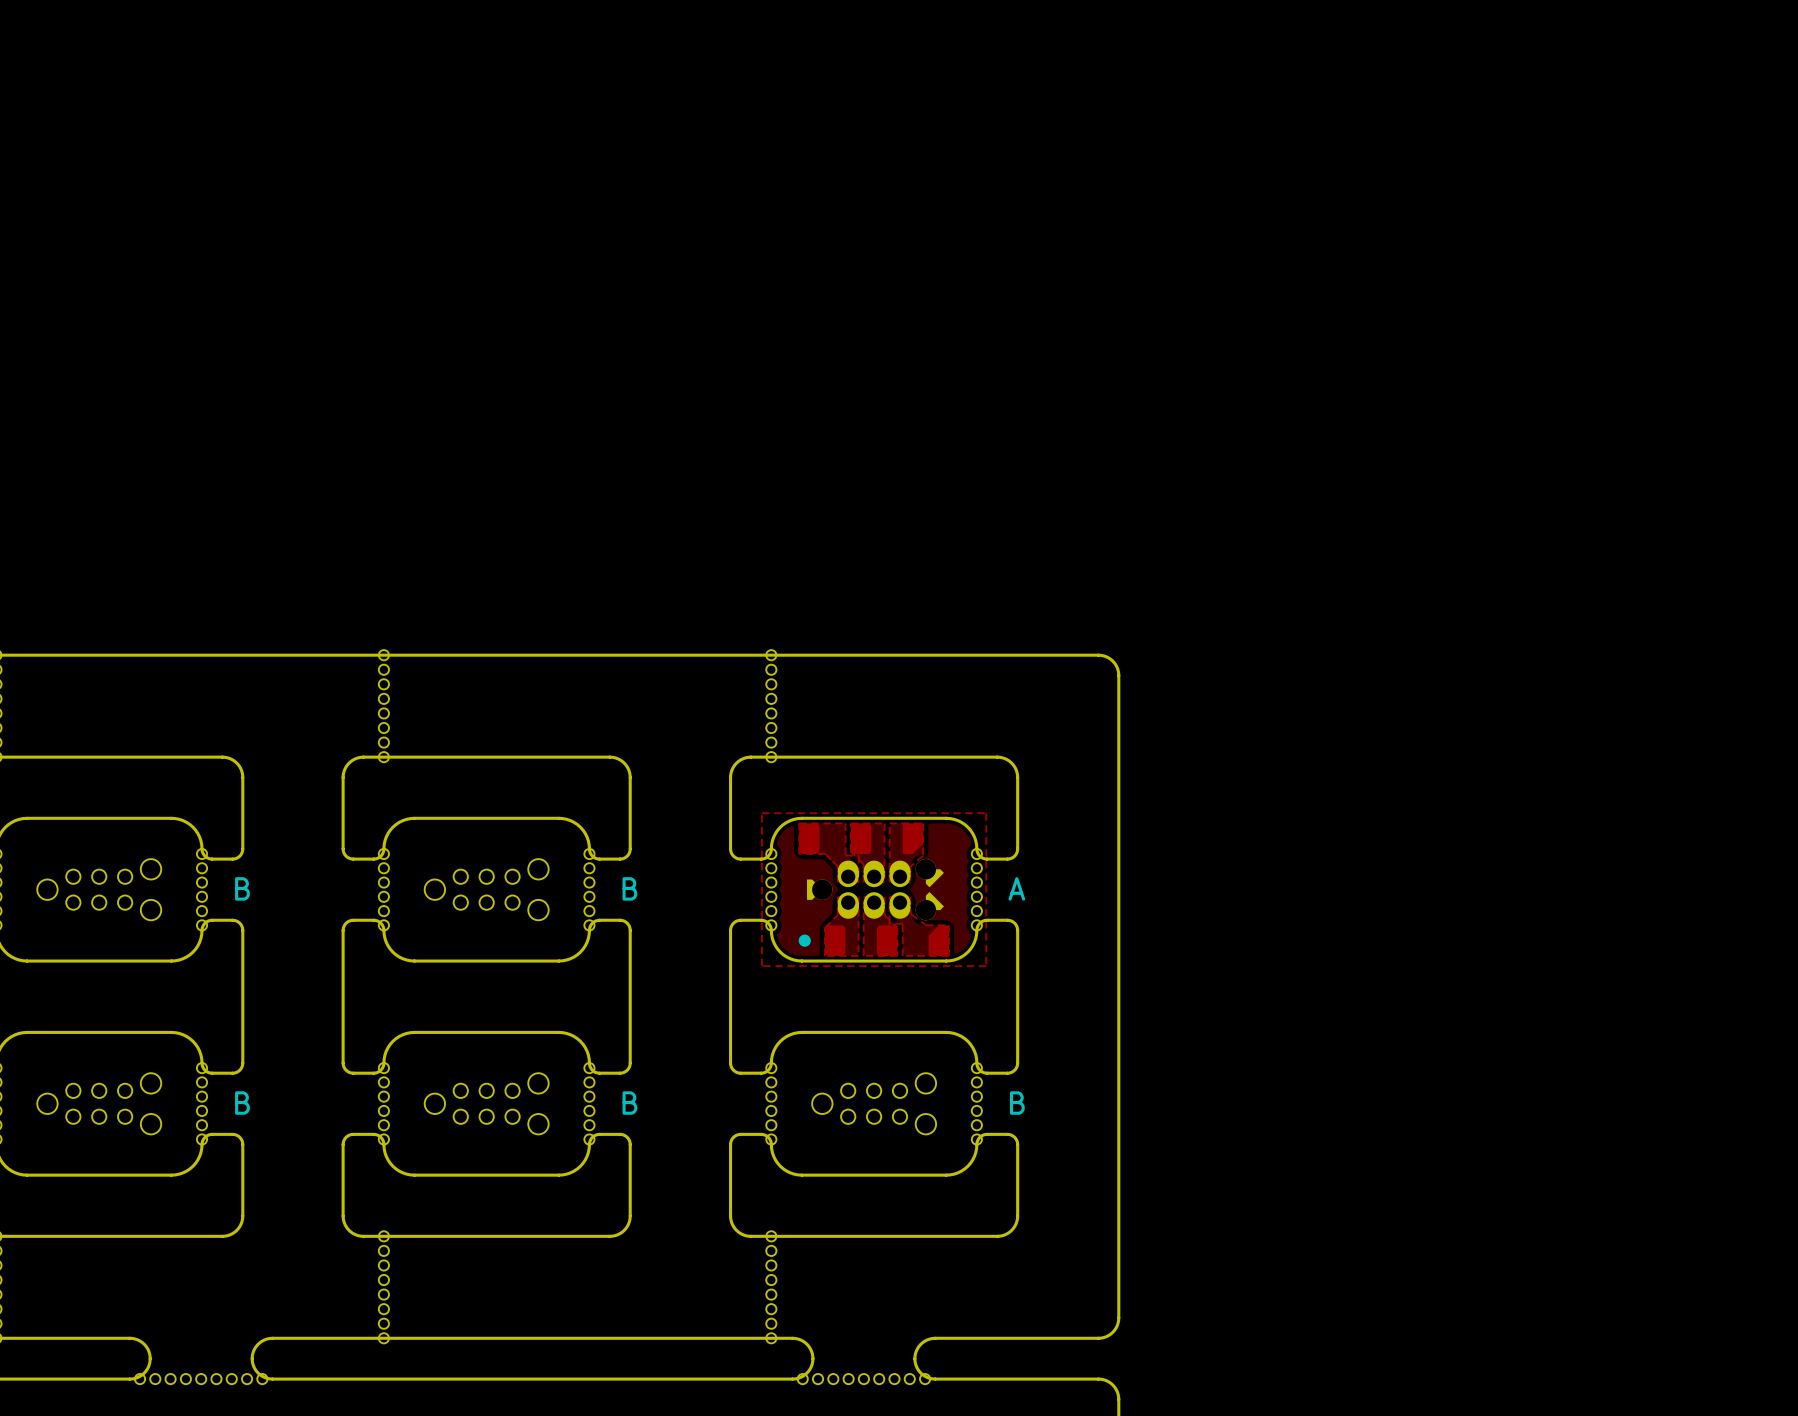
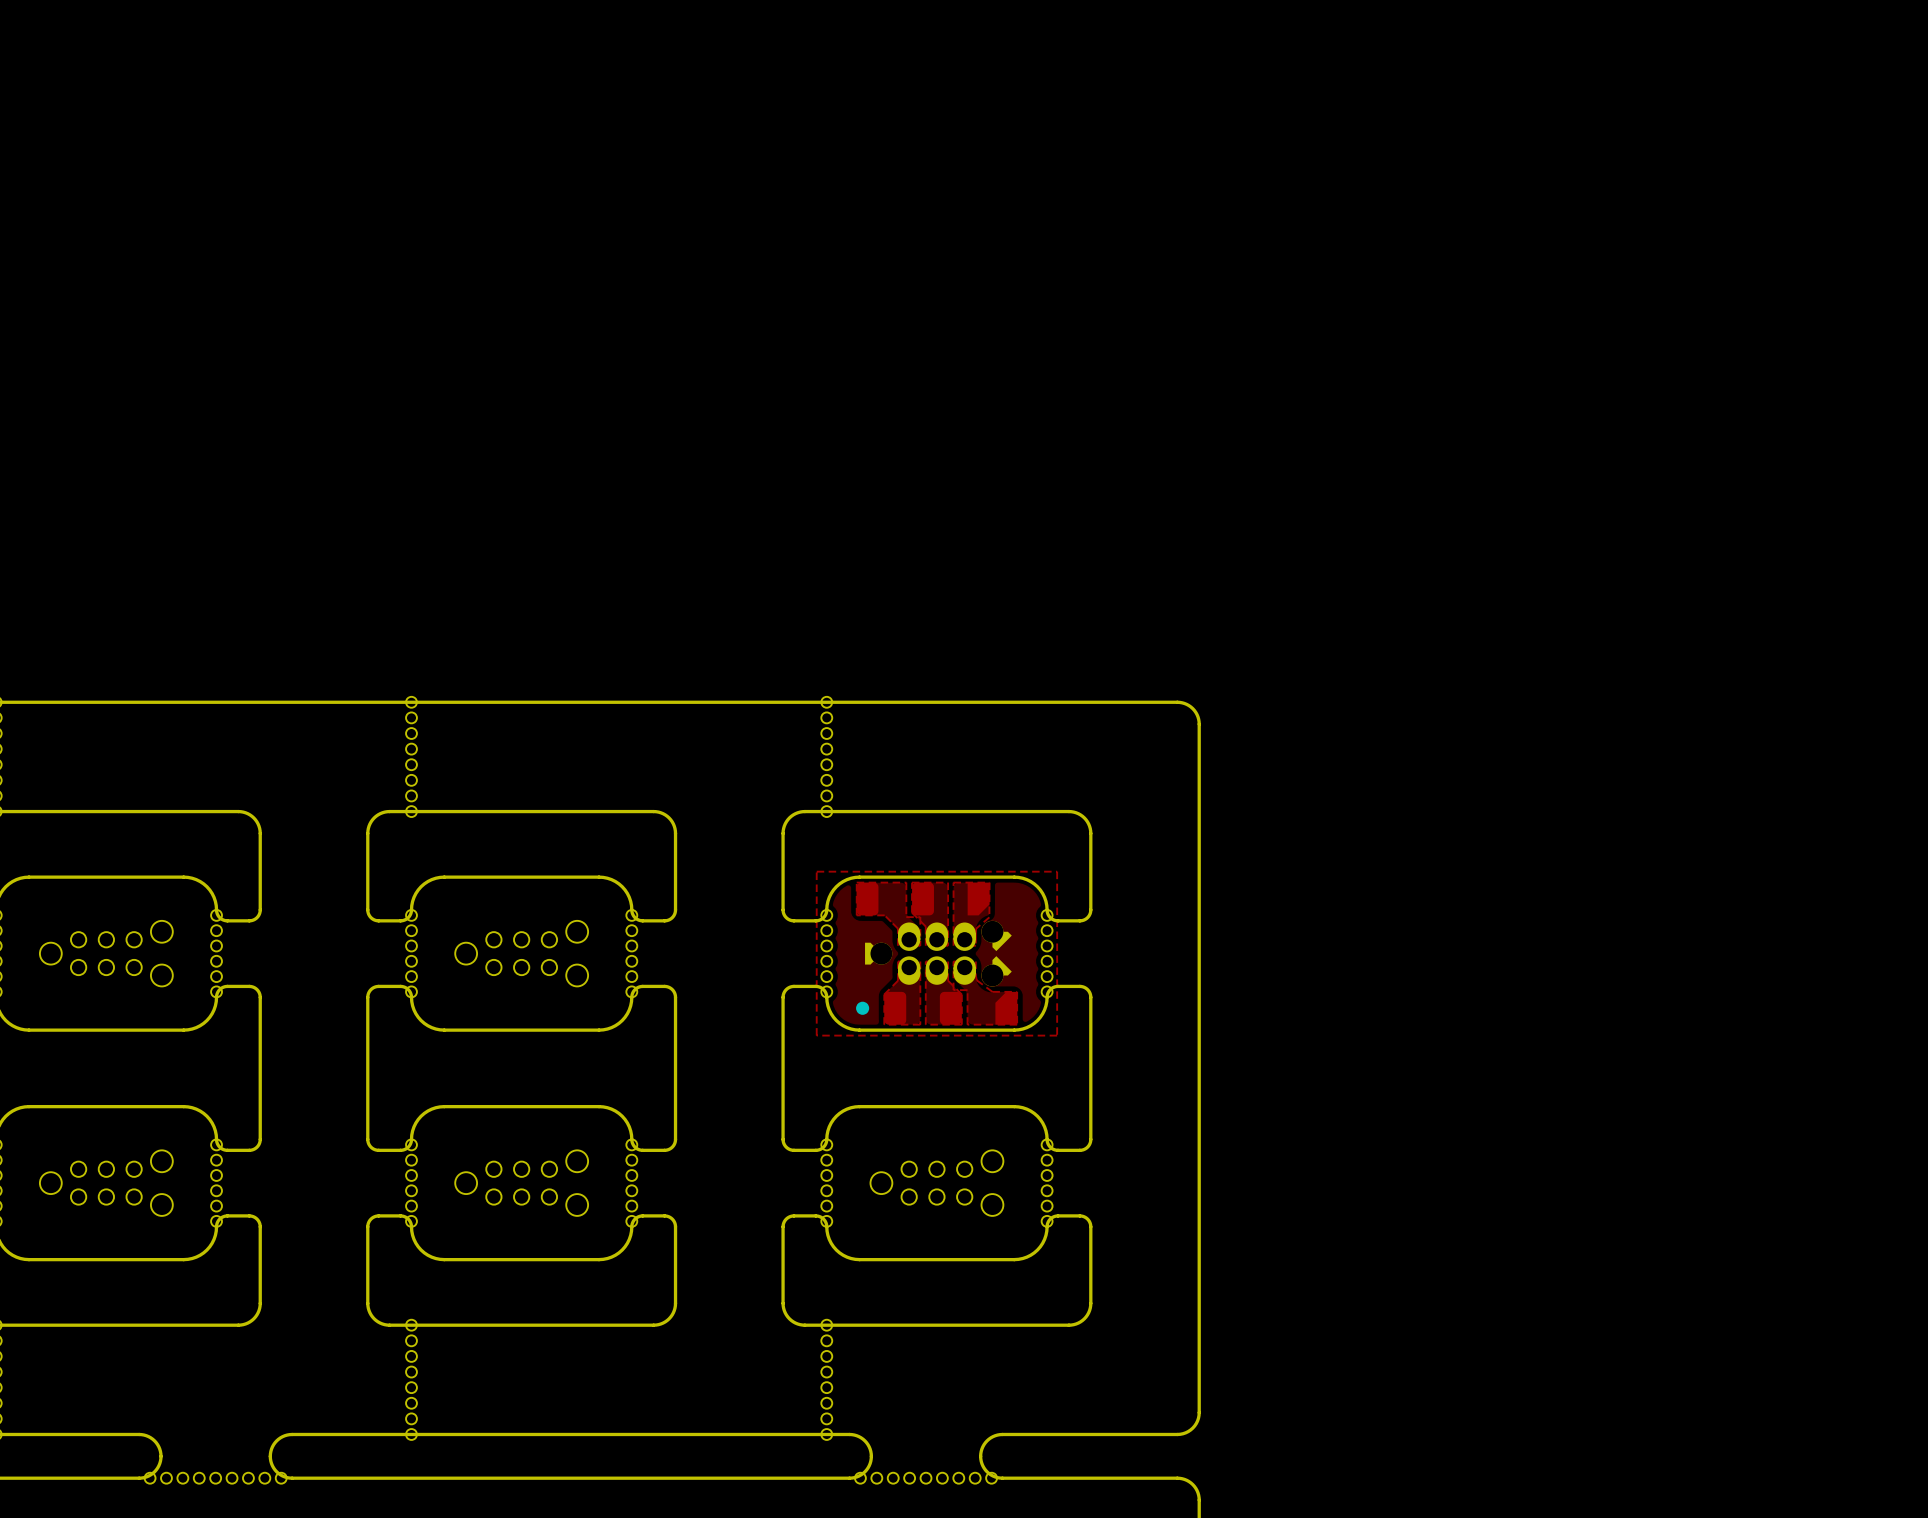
text: B (242, 888) -> none
text: B (629, 888) -> none
text: A (1016, 888) -> none
text: B (242, 1103) -> none
text: B (629, 1103) -> none
text: B (1017, 1103) -> none

